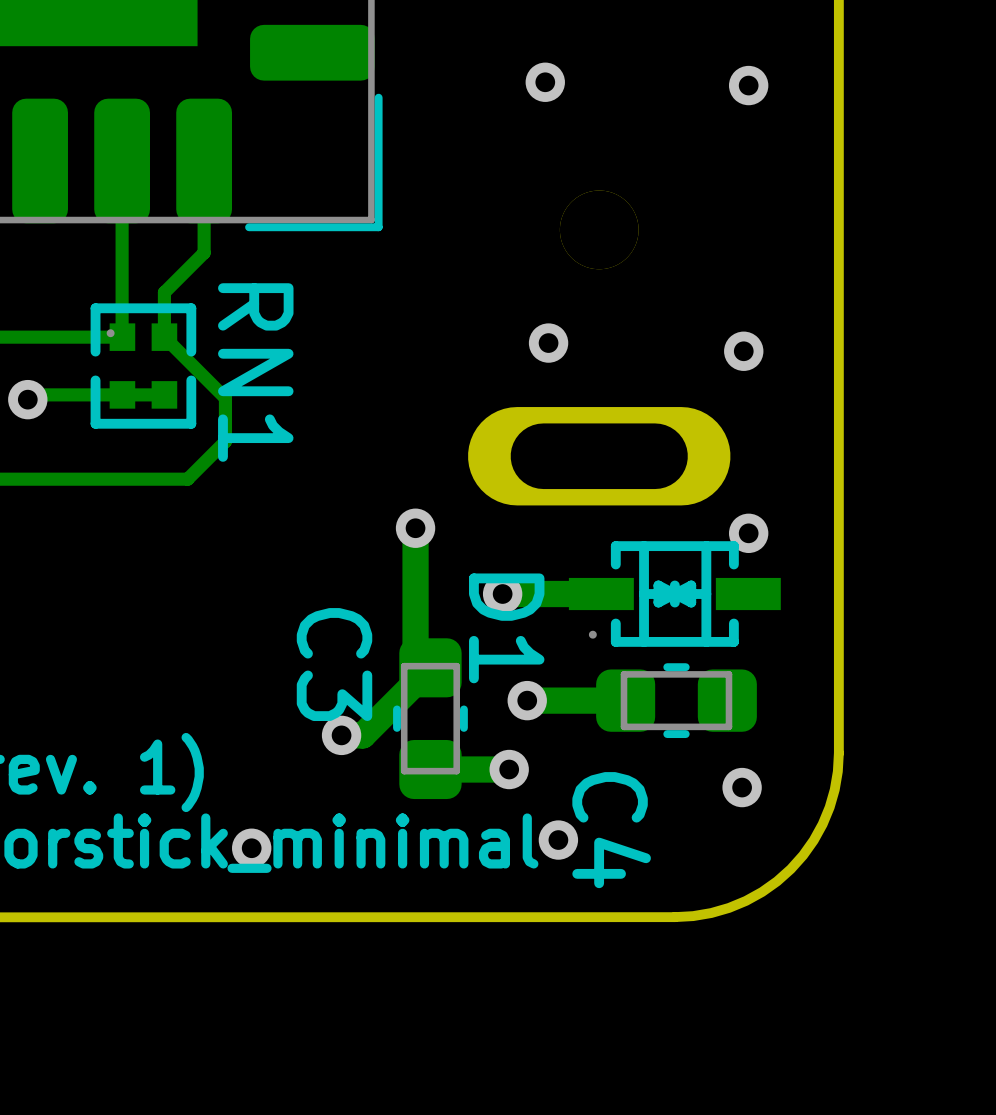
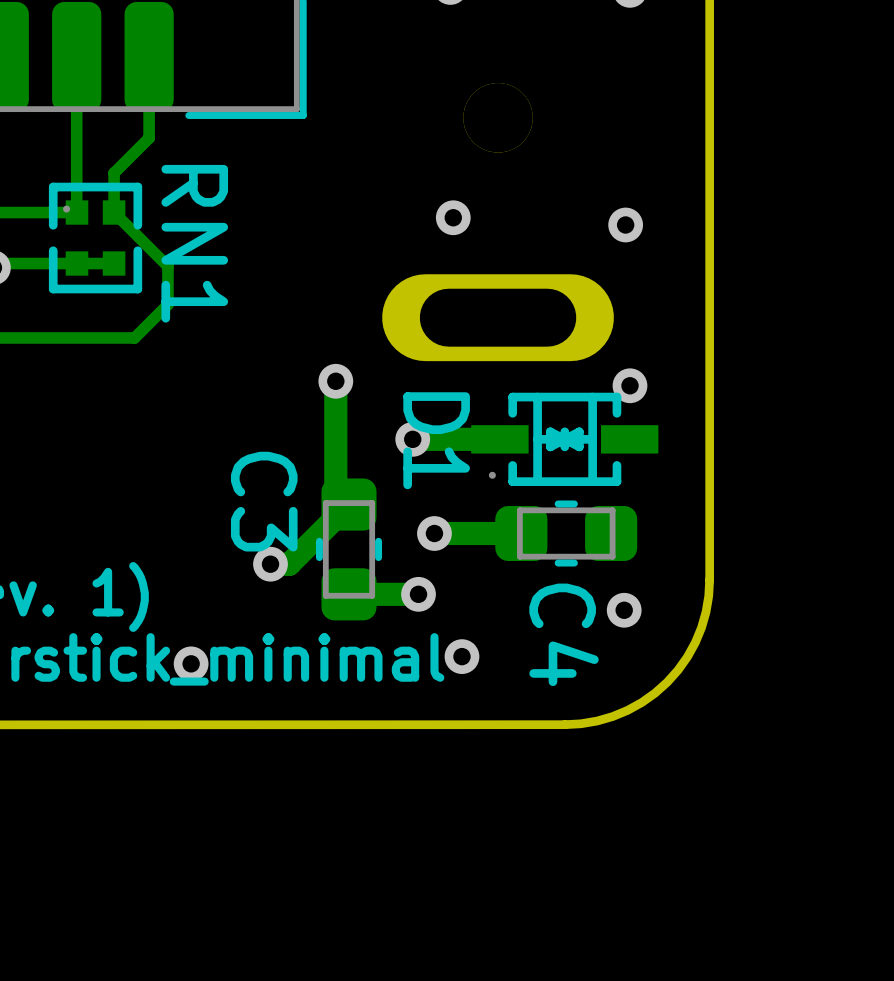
D1 name position: D1 (506, 628) -> D1 (436, 440)
C4 name position: C4 (611, 830) -> C4 (564, 634)

